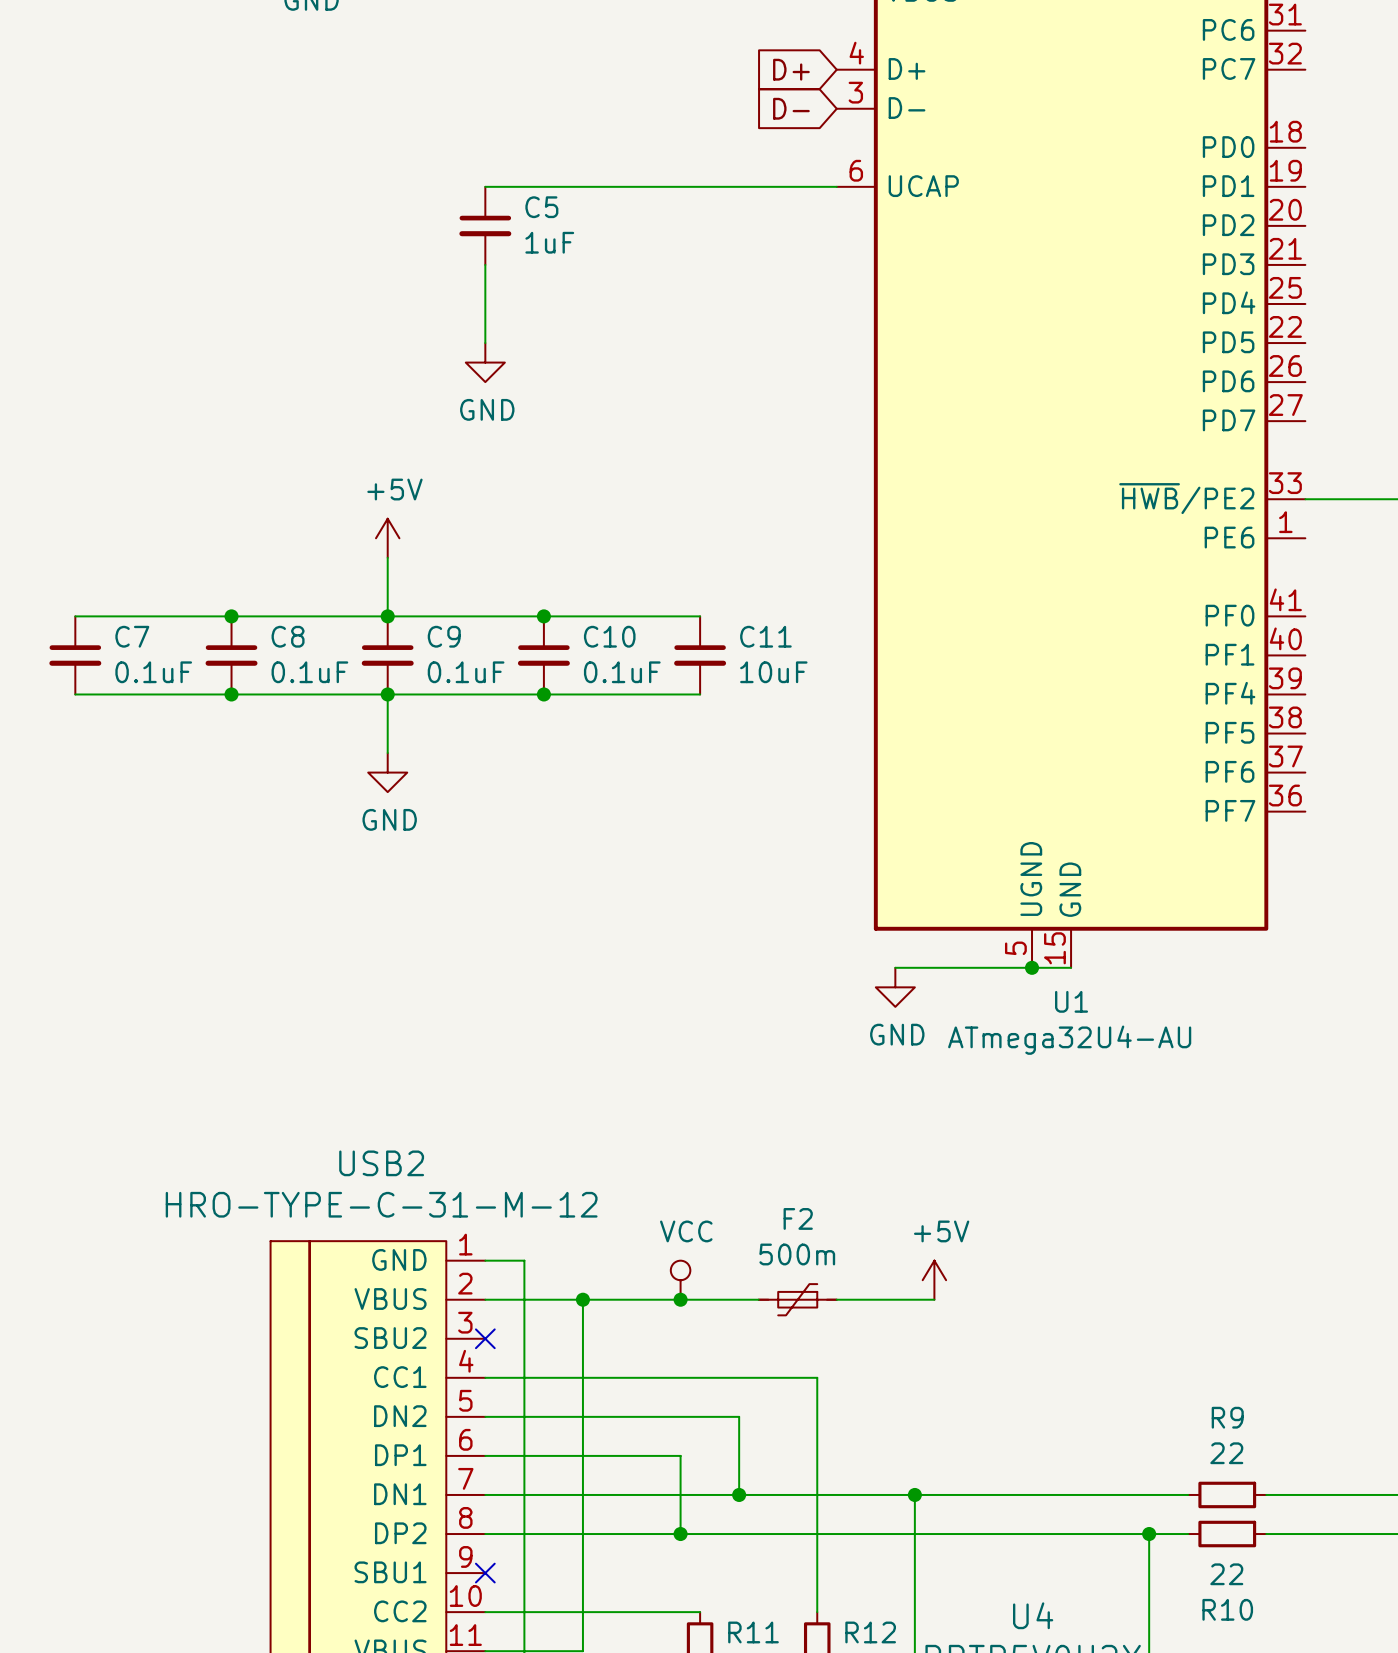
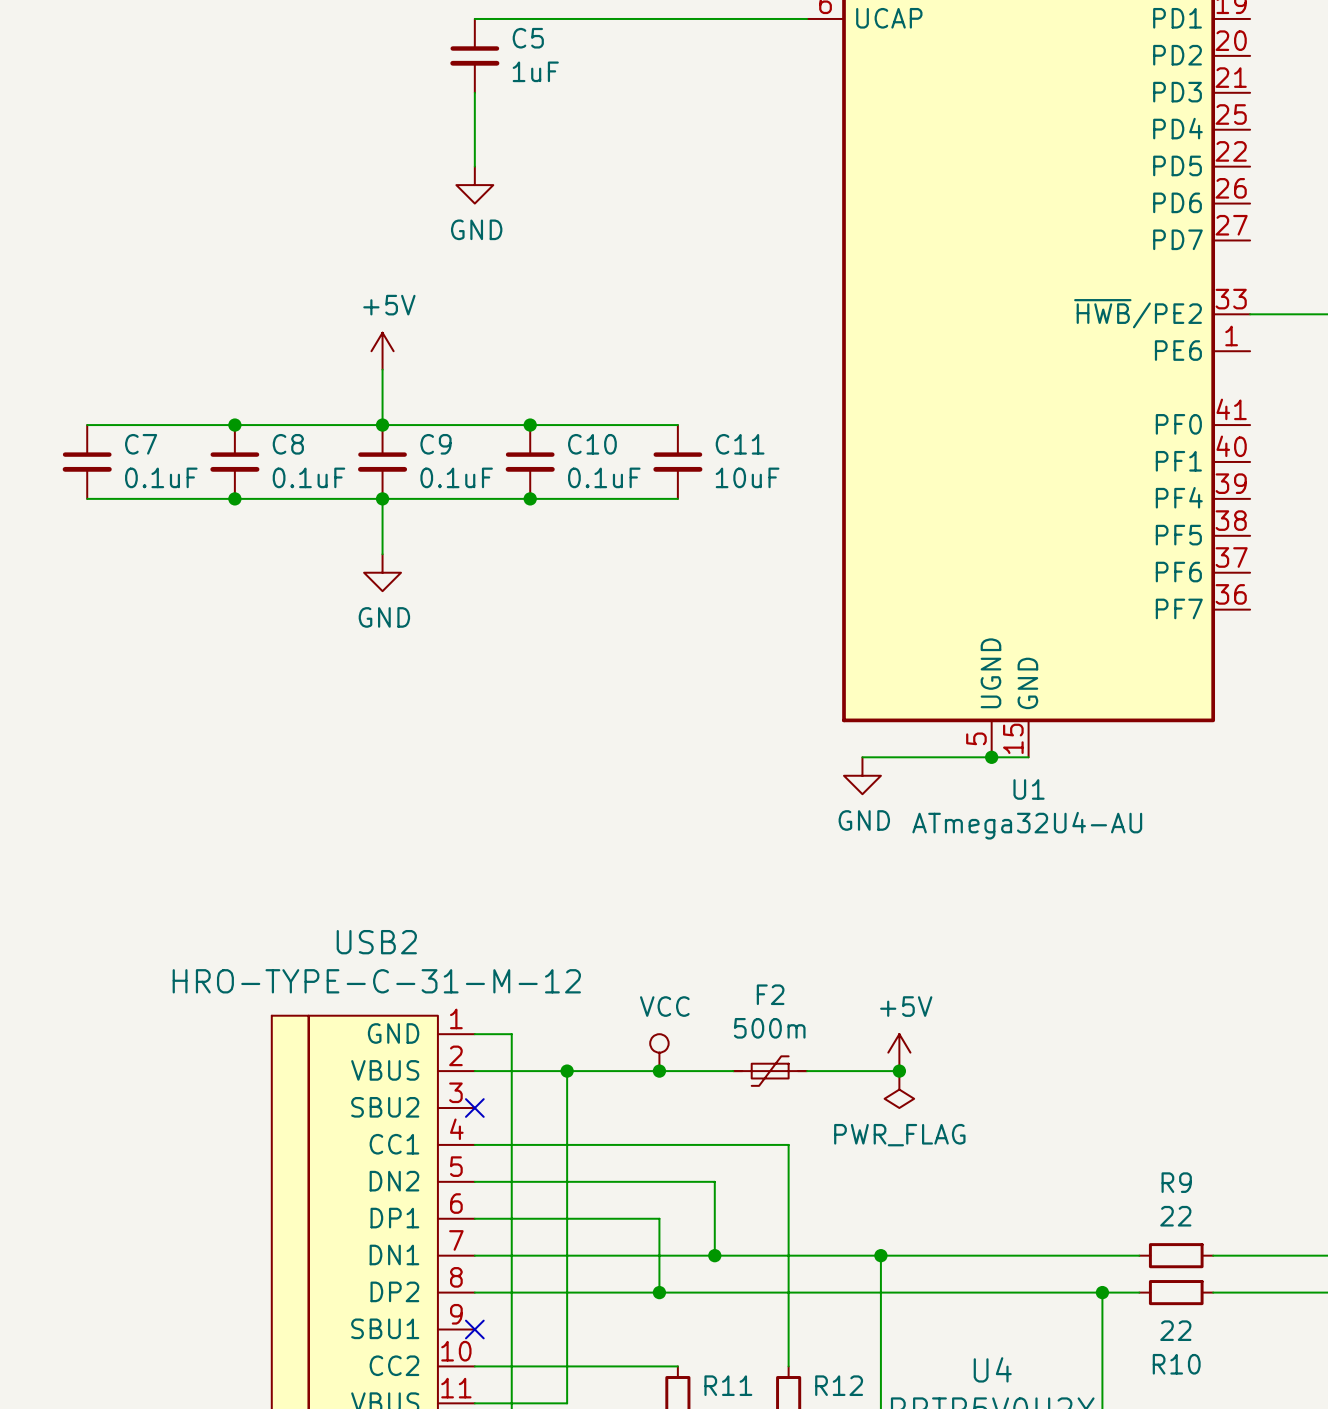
junction: none -> (899, 1071)
power symbol: none -> PWR_FLAG (899, 1089)

